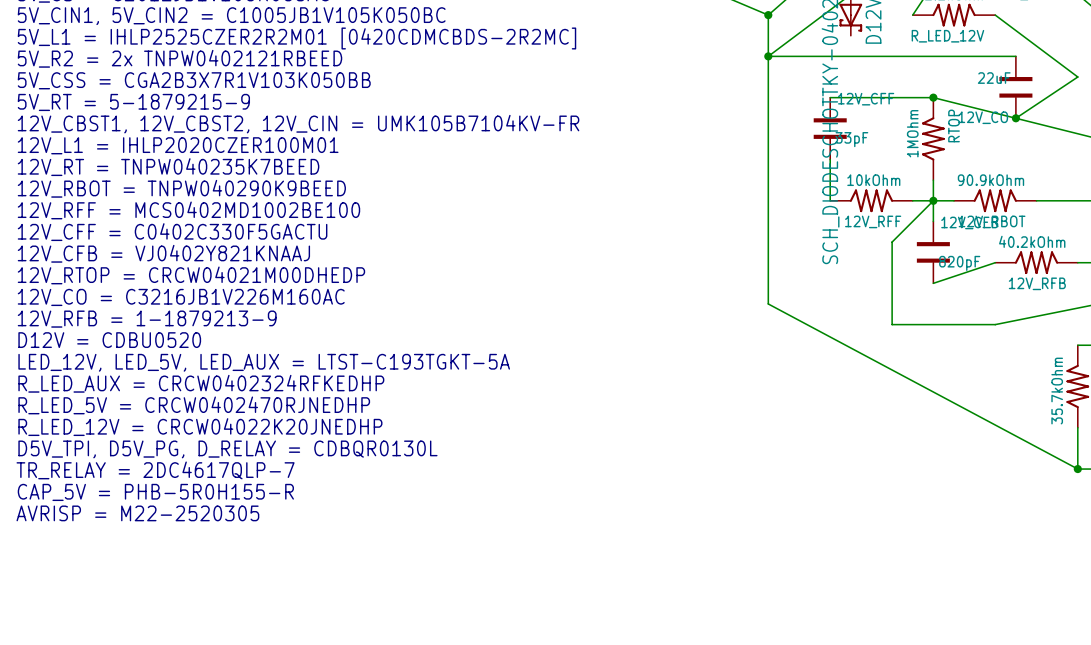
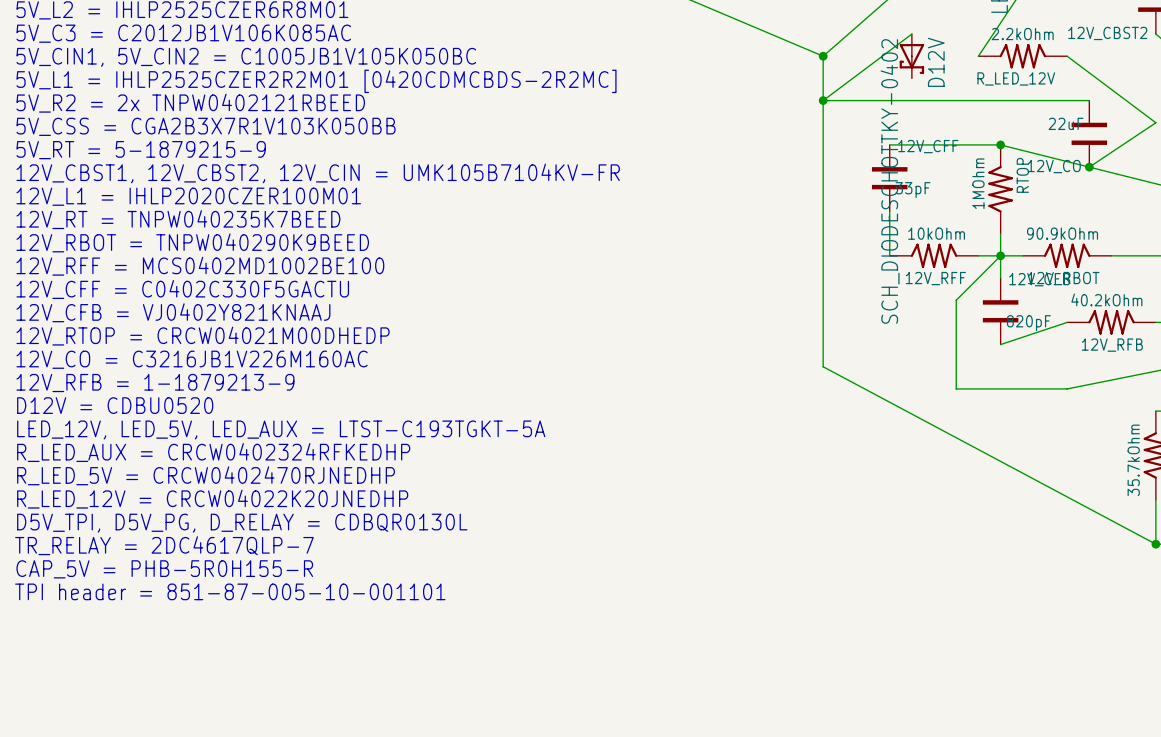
text: AVRISP = M22-2520305 (137, 513) -> TPI header = 851-87-005-10-001101 (230, 591)

